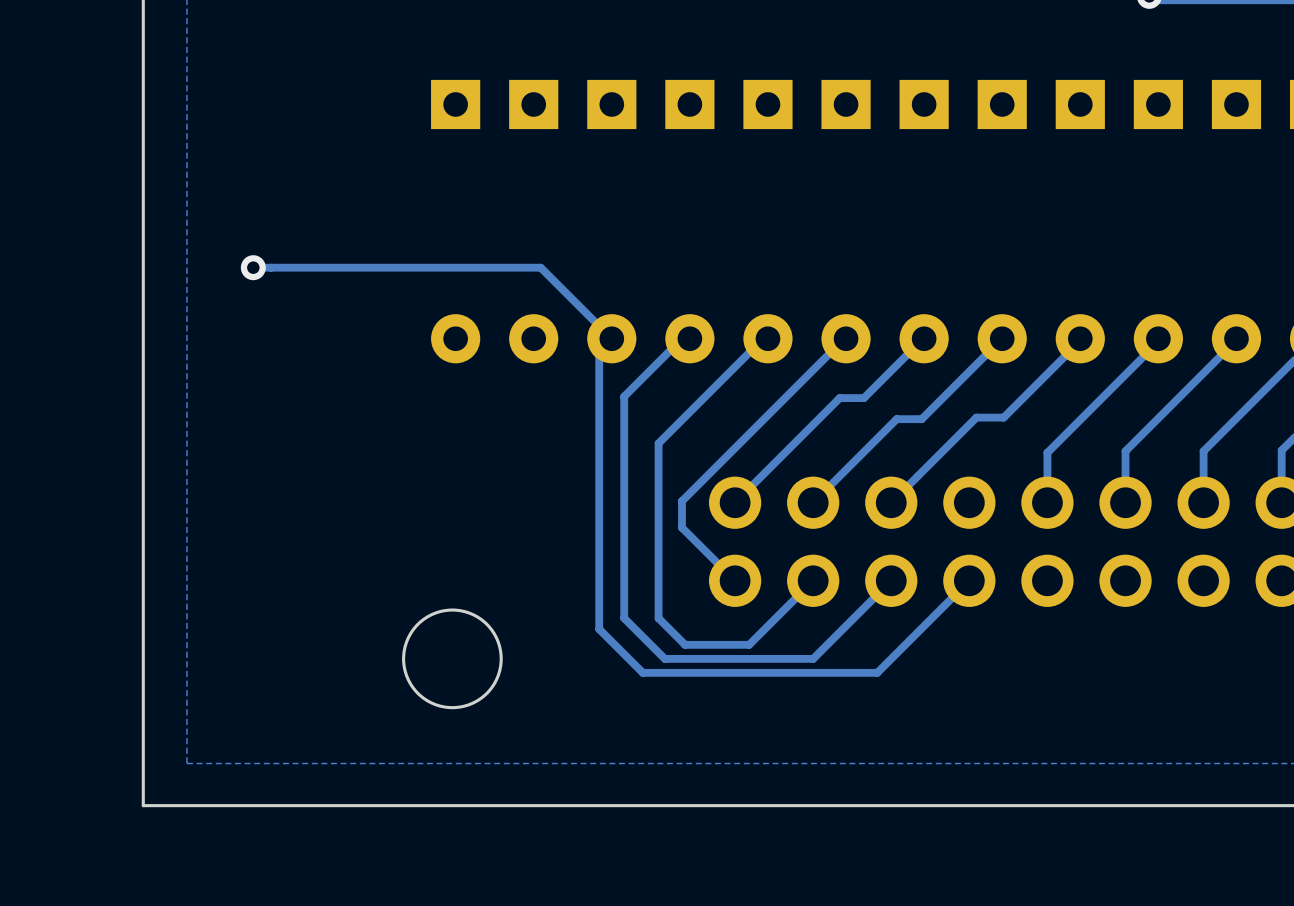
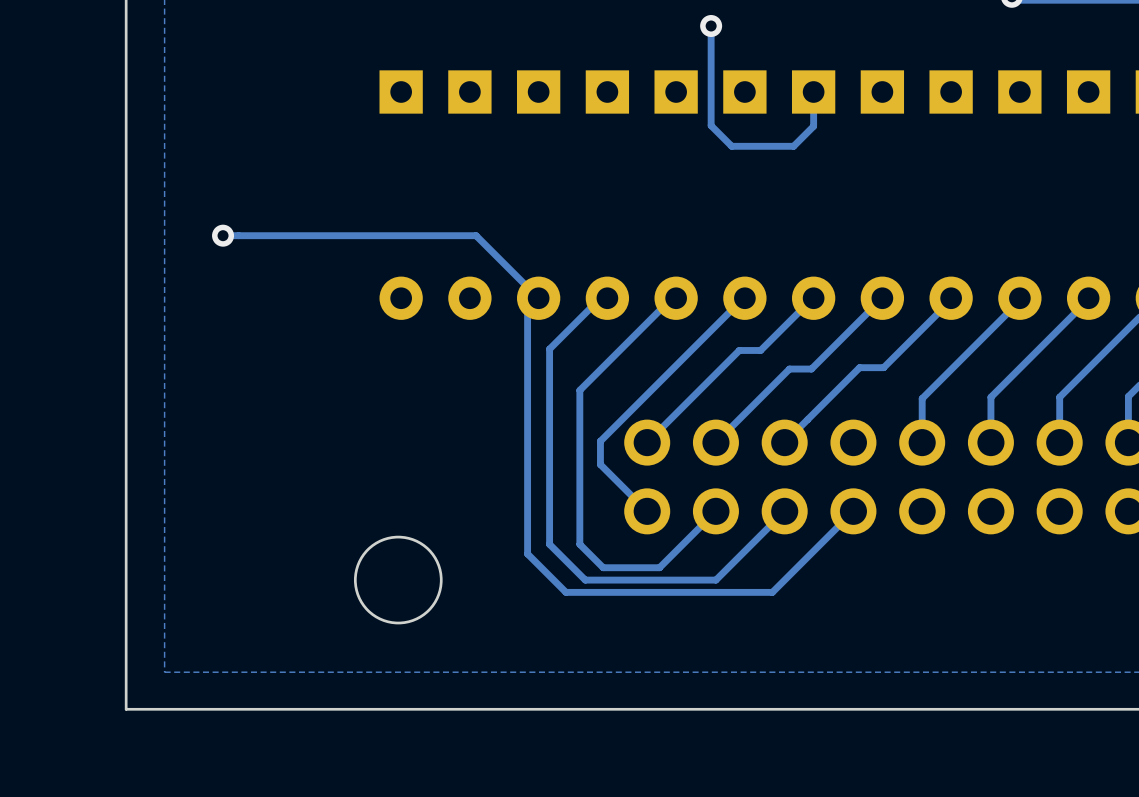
track: none -> (711, 26) (711, 125) (731, 146) (793, 146) (813, 126) (813, 92)
via: none -> (711, 26)

